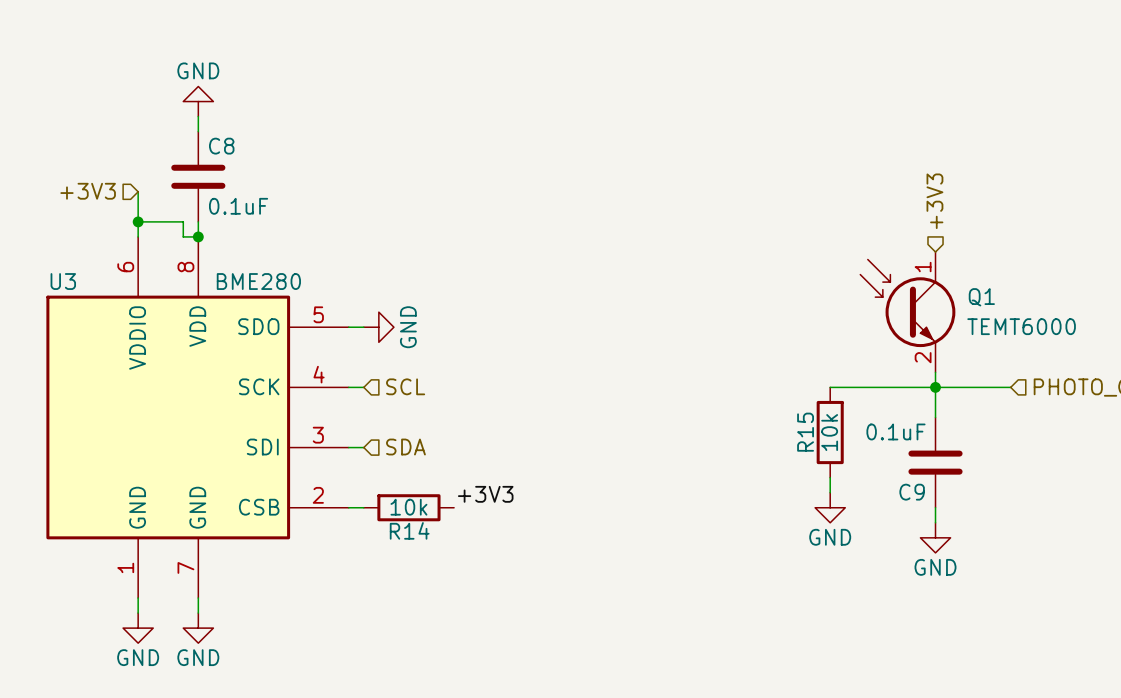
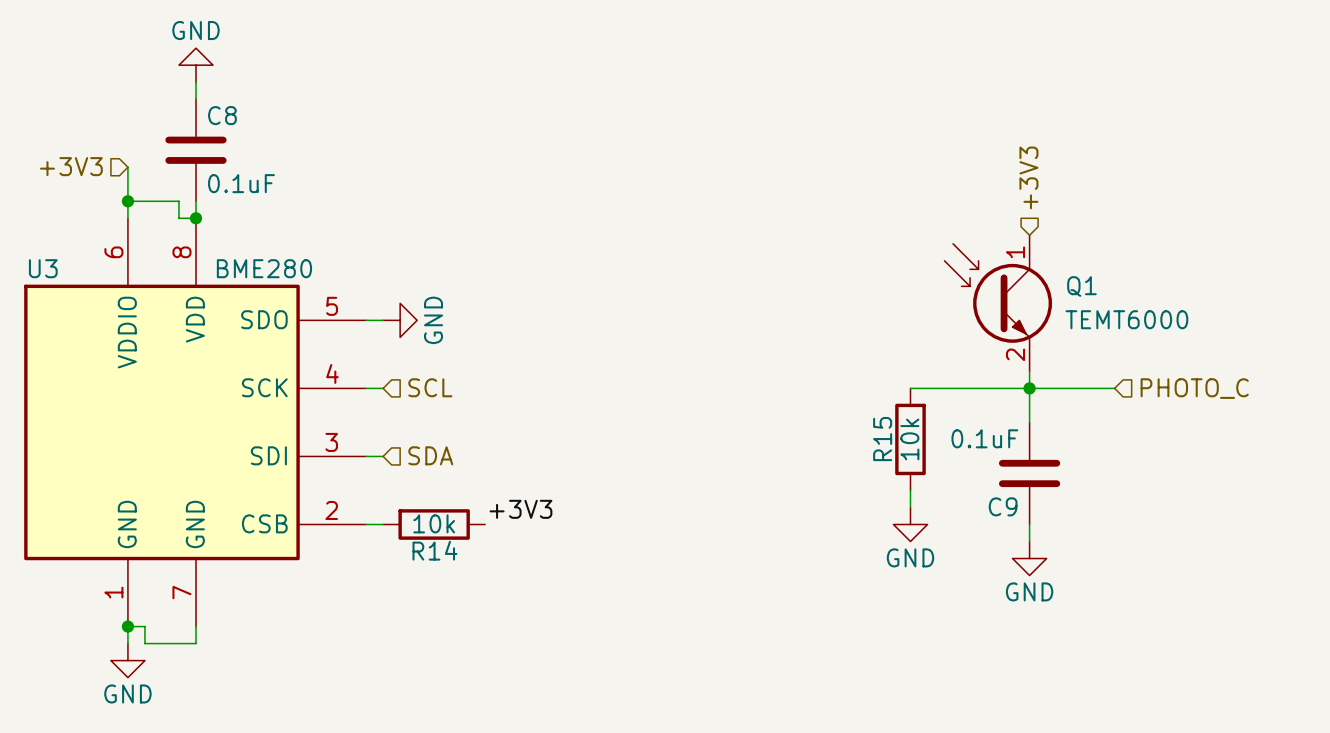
wire: none -> (127, 626) (144, 626) (144, 643) (195, 643)
junction: none -> (127, 626)
power symbol: GND (198, 628) -> none

